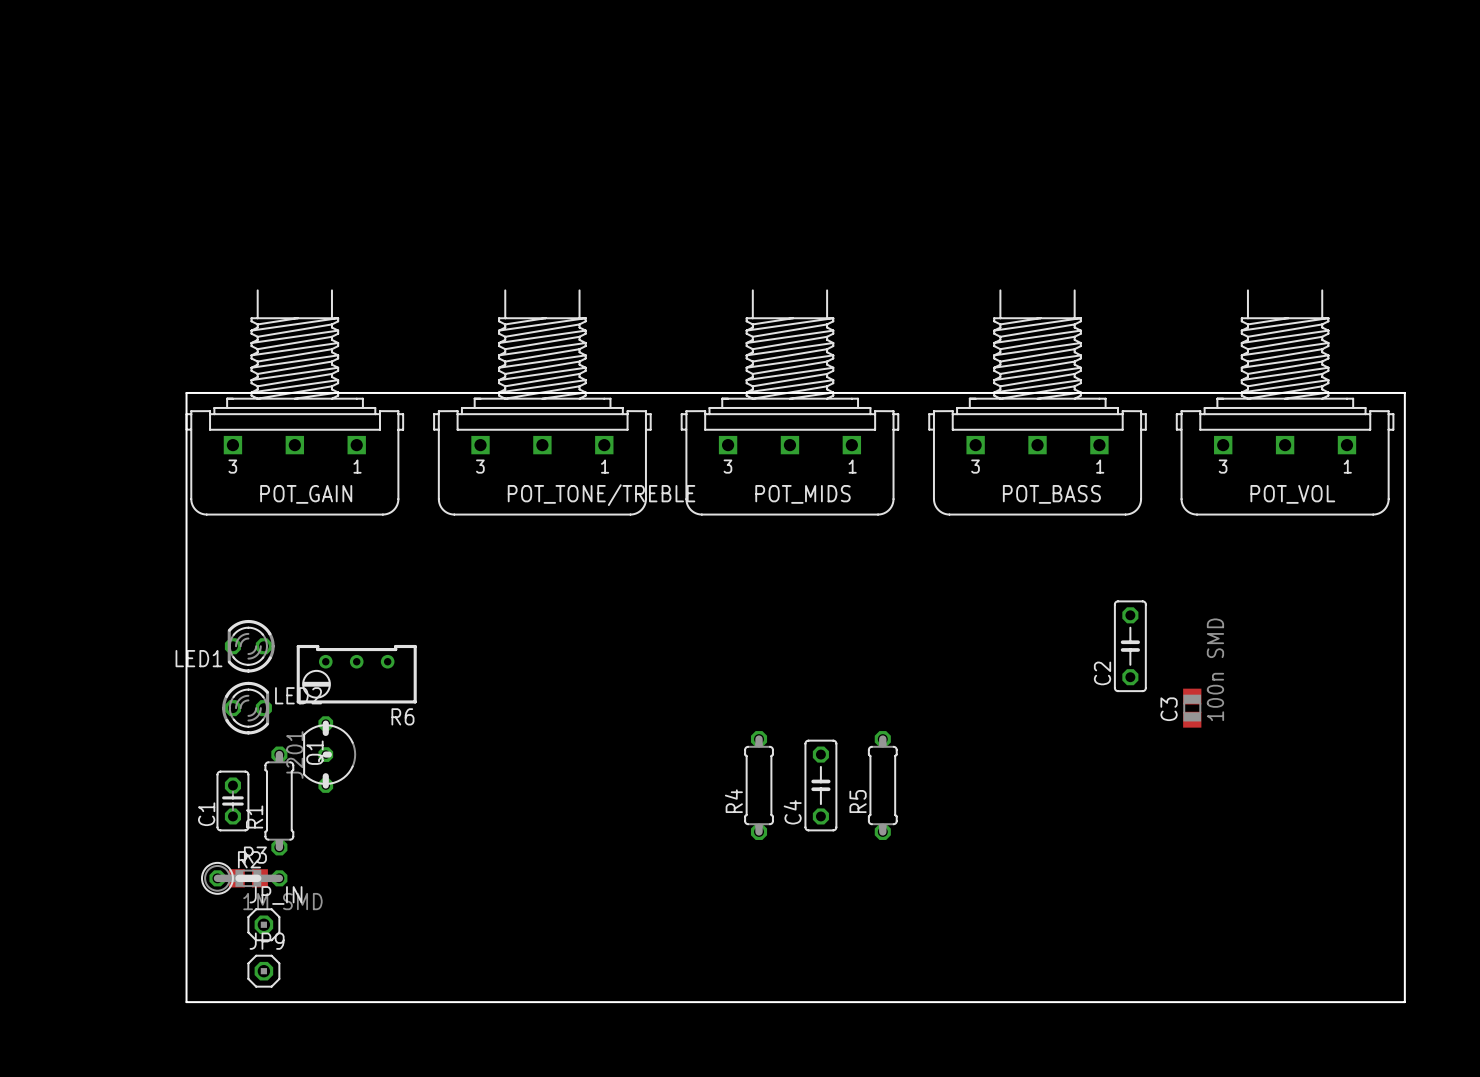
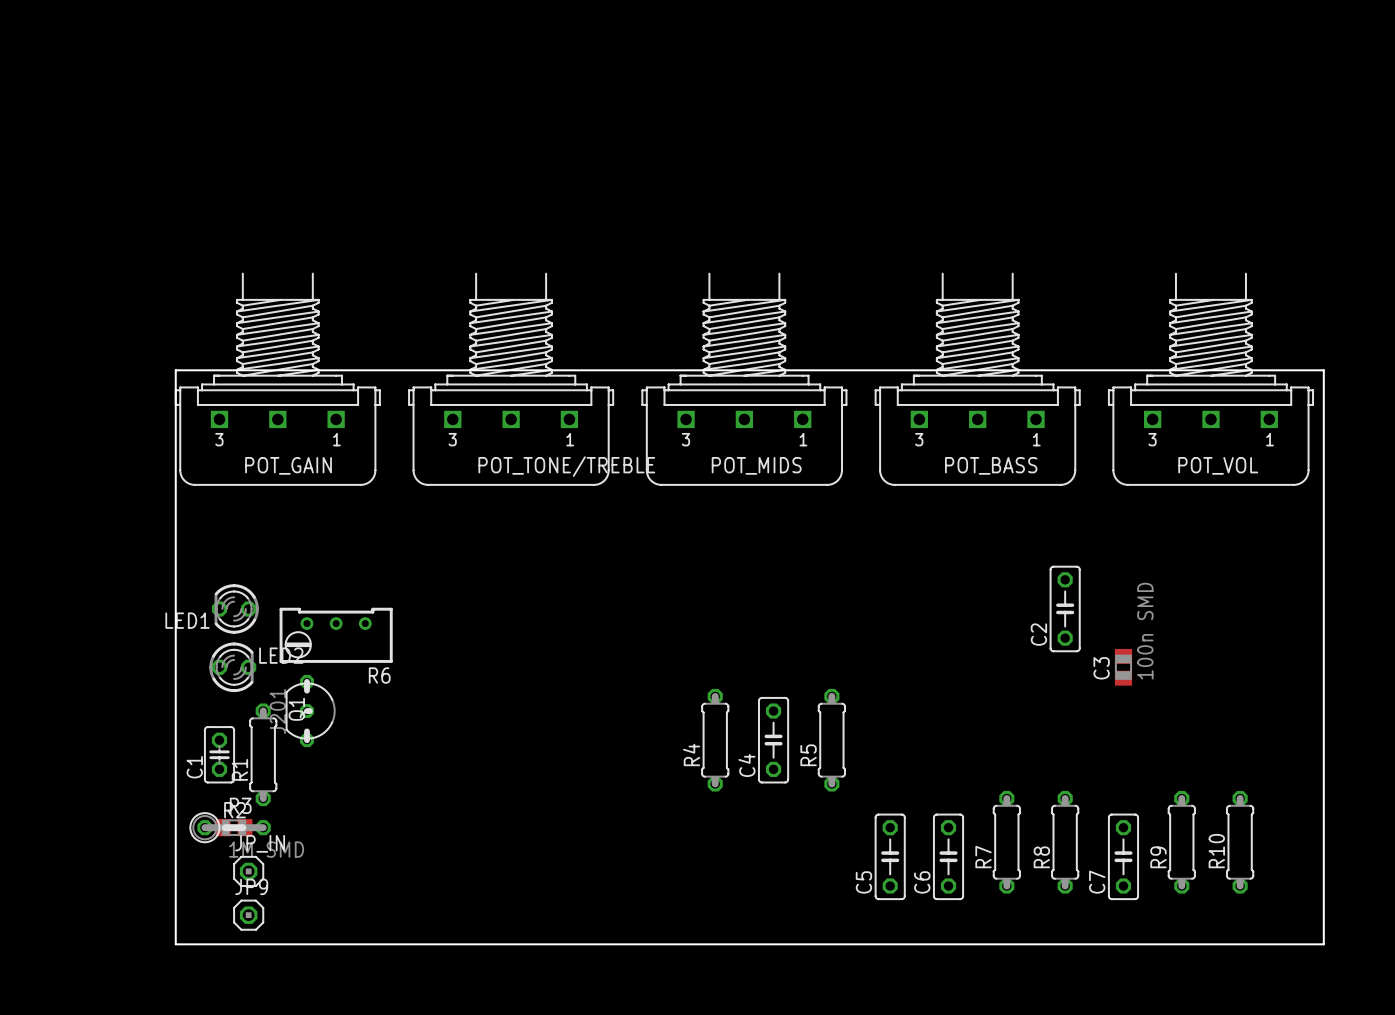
R7: none -> (1006, 842)
R8: none -> (1065, 842)
R9: none -> (1181, 842)
R10: none -> (1240, 842)
C5: none -> (890, 856)
C6: none -> (948, 856)
C7: none -> (1123, 856)

